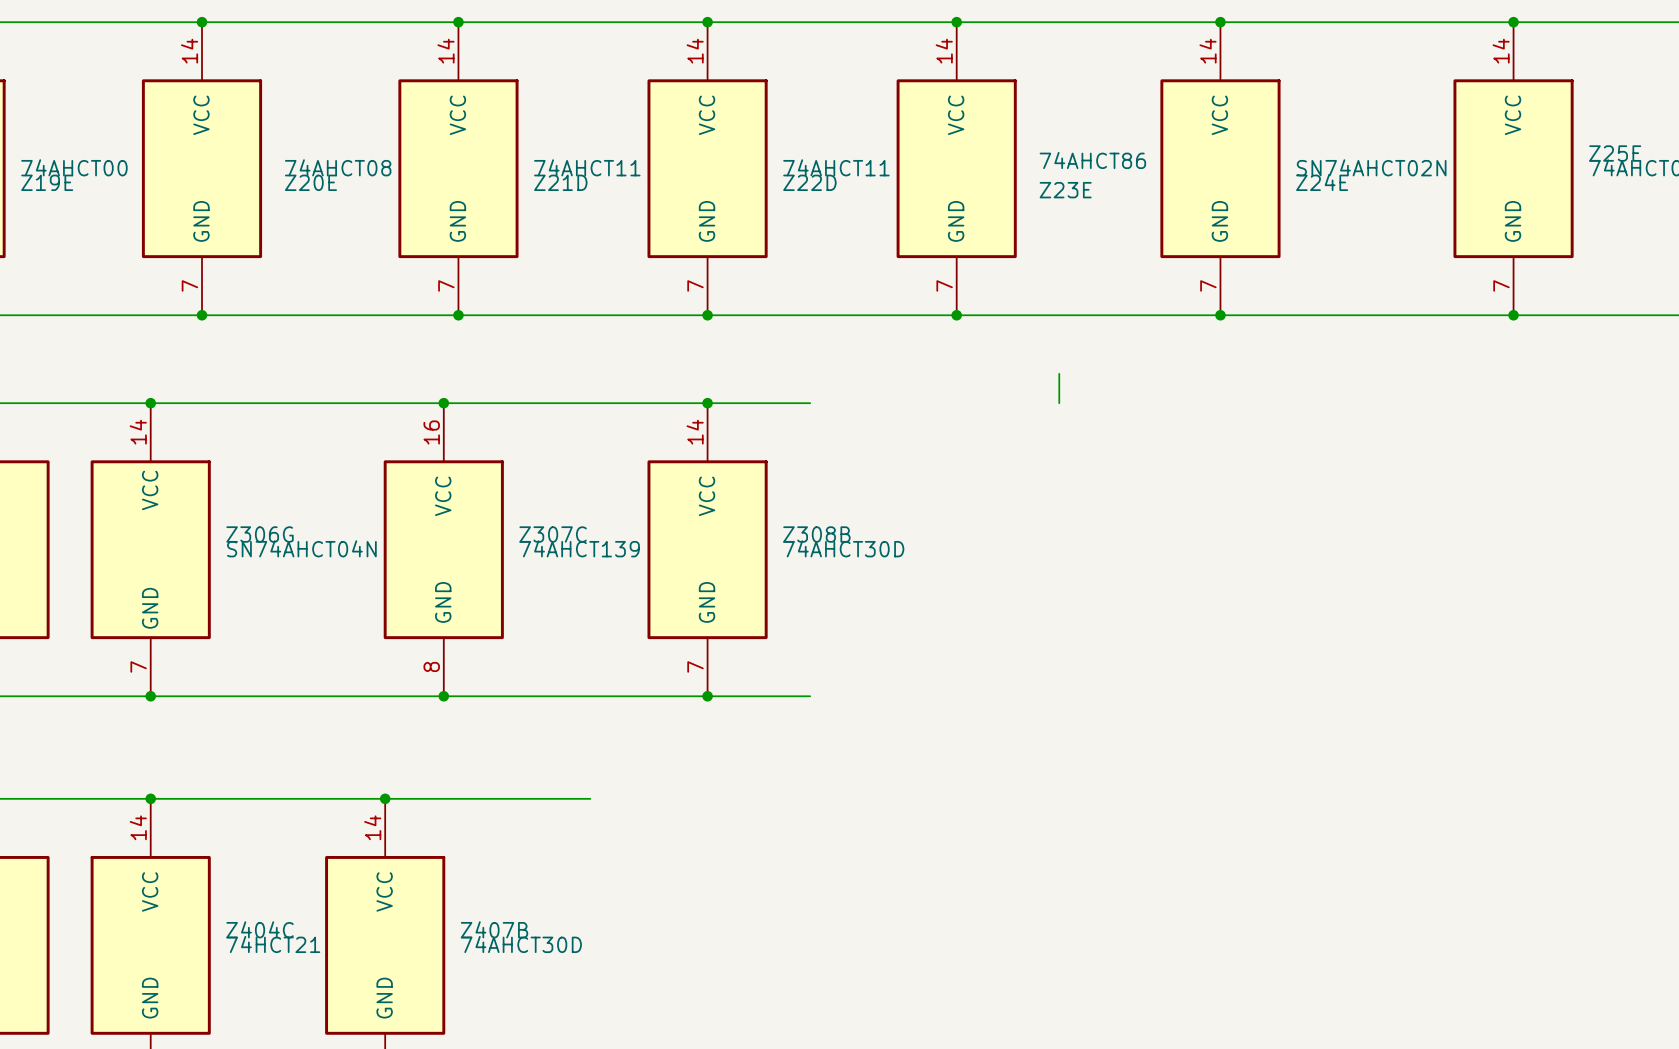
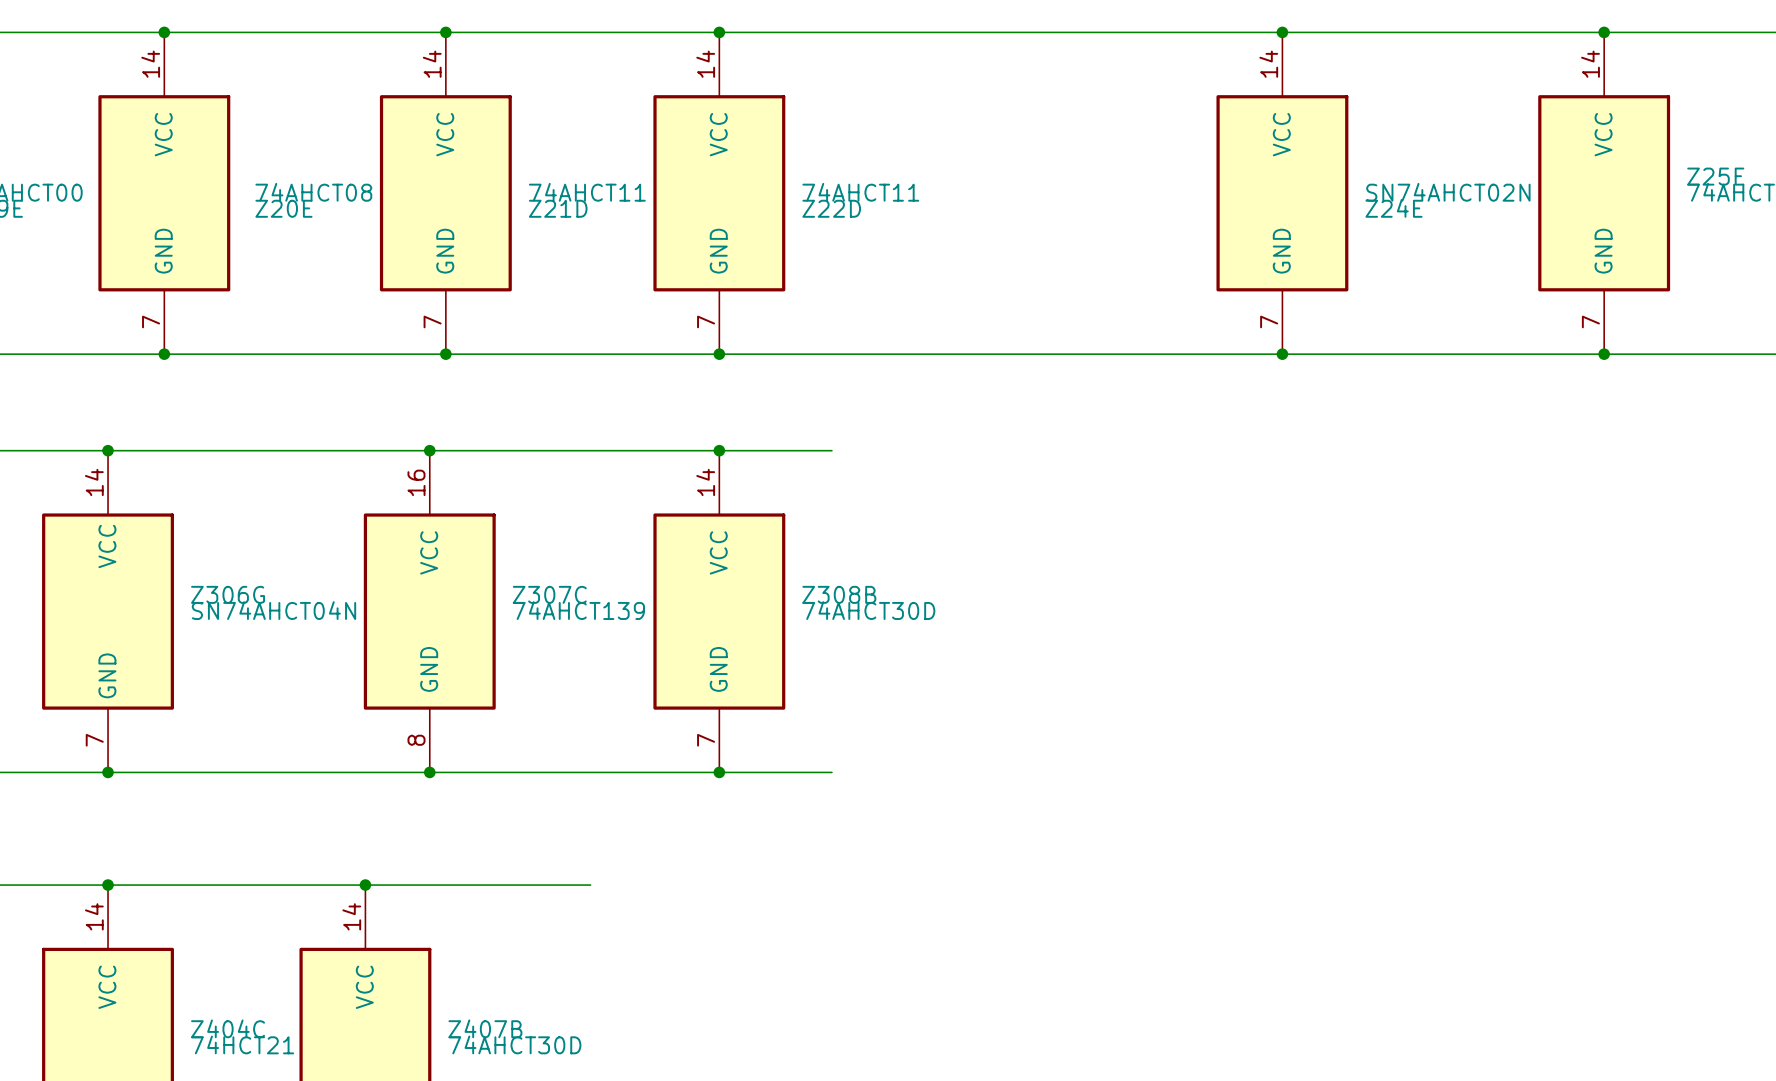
junction: (956, 22) -> none
Z23E: 74AHCT86 (956, 168) -> none
junction: (956, 315) -> none
wire: (1059, 373) (1059, 403) -> none

